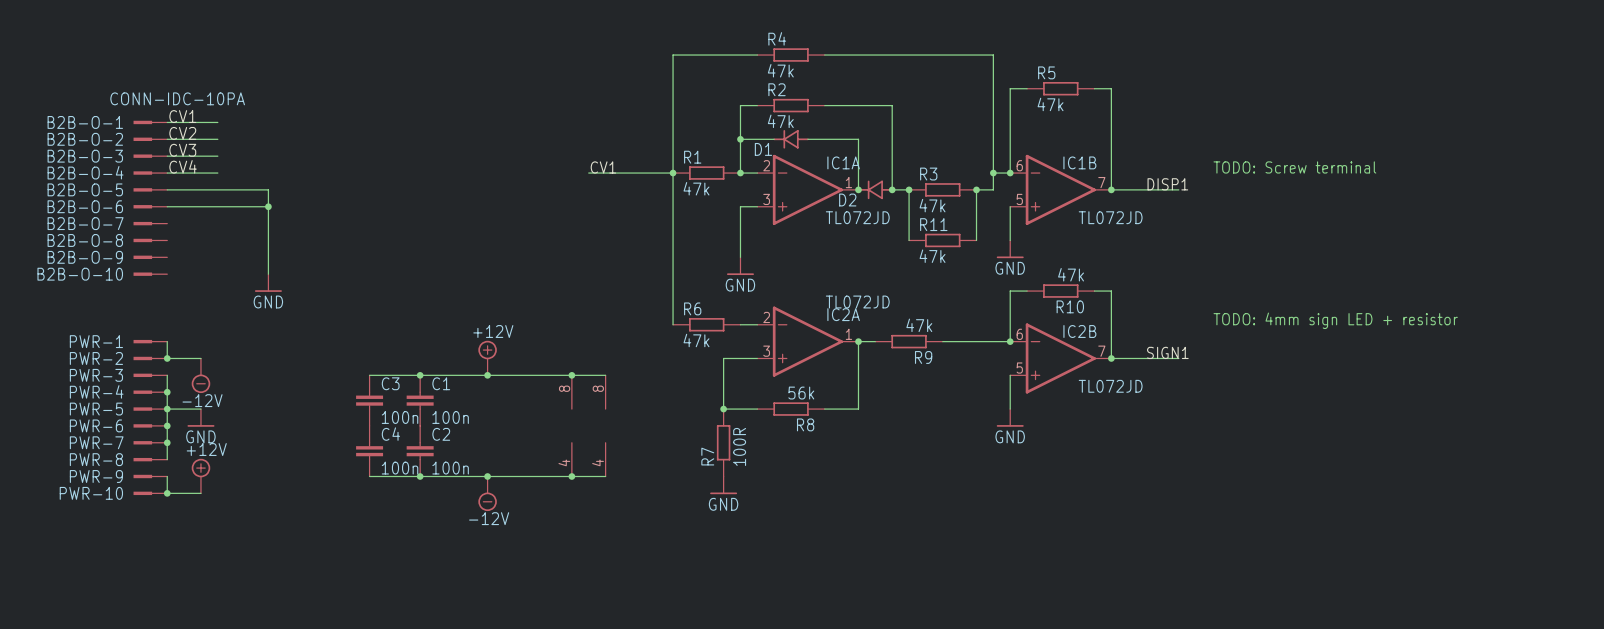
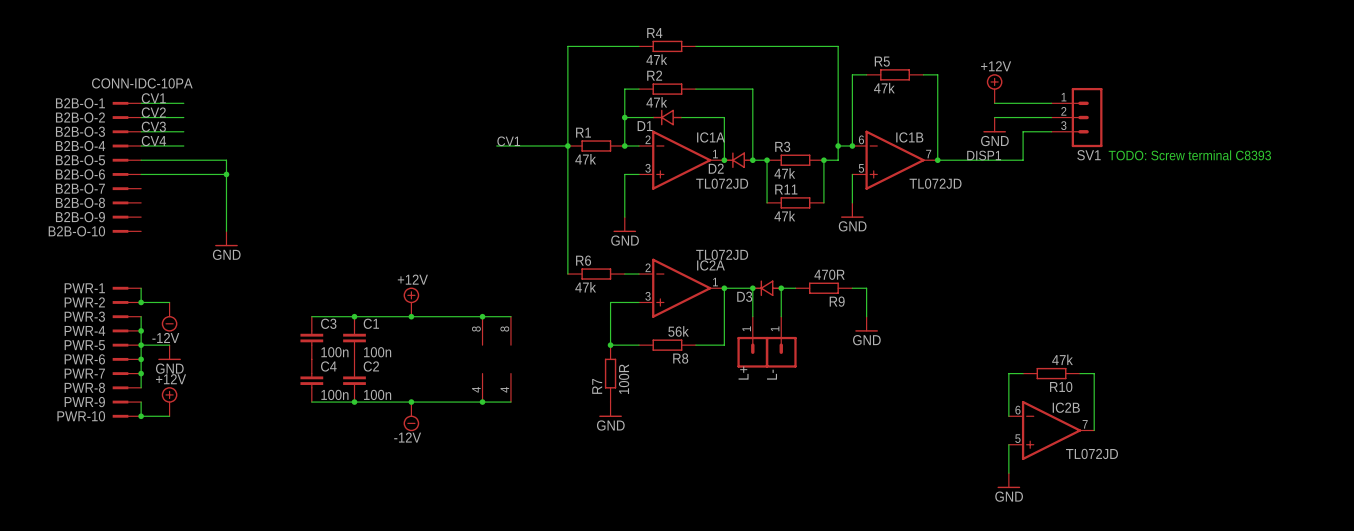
power symbol: none -> +12V (994, 88)
wire: none -> (994, 103) (1051, 103)
wire: none -> (994, 117) (1051, 117)
SV1: none -> (1076, 117)
power symbol: none -> GND (994, 125)
wire: none -> (1051, 131) (1023, 131) (1023, 160) (994, 160)
text: TODO: Screw terminal (1294, 167) -> TODO: Screw terminal C8393 (1189, 155)
wire: (1027, 291) (1010, 291) (1010, 341) (942, 341) -> (781, 316) (781, 288) (795, 288)
R10 position: (1060, 291) -> (1051, 373)
wire: (1094, 291) (1111, 291) (1111, 358) (1178, 358) -> none
text: TODO: 4mm sign LED + resistor (1335, 320) -> none
R9 value: 47k (919, 325) -> 470R (829, 274)
wire: none -> (738, 288) (752, 288) (752, 316)
junction: none -> (752, 288)
R9 position: (909, 341) -> (823, 288)
D3: none -> (767, 288)
junction: none -> (781, 288)
junction: (1010, 341) -> none
label: SIGN1 (1167, 352) -> none
IC2B position: (1060, 358) -> (1051, 430)
junction: (1111, 358) -> none
wire: (1010, 375) (1010, 409) -> none
L+: none -> (752, 342)
L-: none -> (781, 342)
power symbol position: GND (1010, 417) -> GND (866, 324)
wire: none -> (1023, 373) (1008, 373) (1008, 416)
wire: none -> (1079, 373) (1094, 373) (1094, 430)
wire: none -> (1008, 444) (1008, 473)
power symbol: none -> GND (1008, 480)

